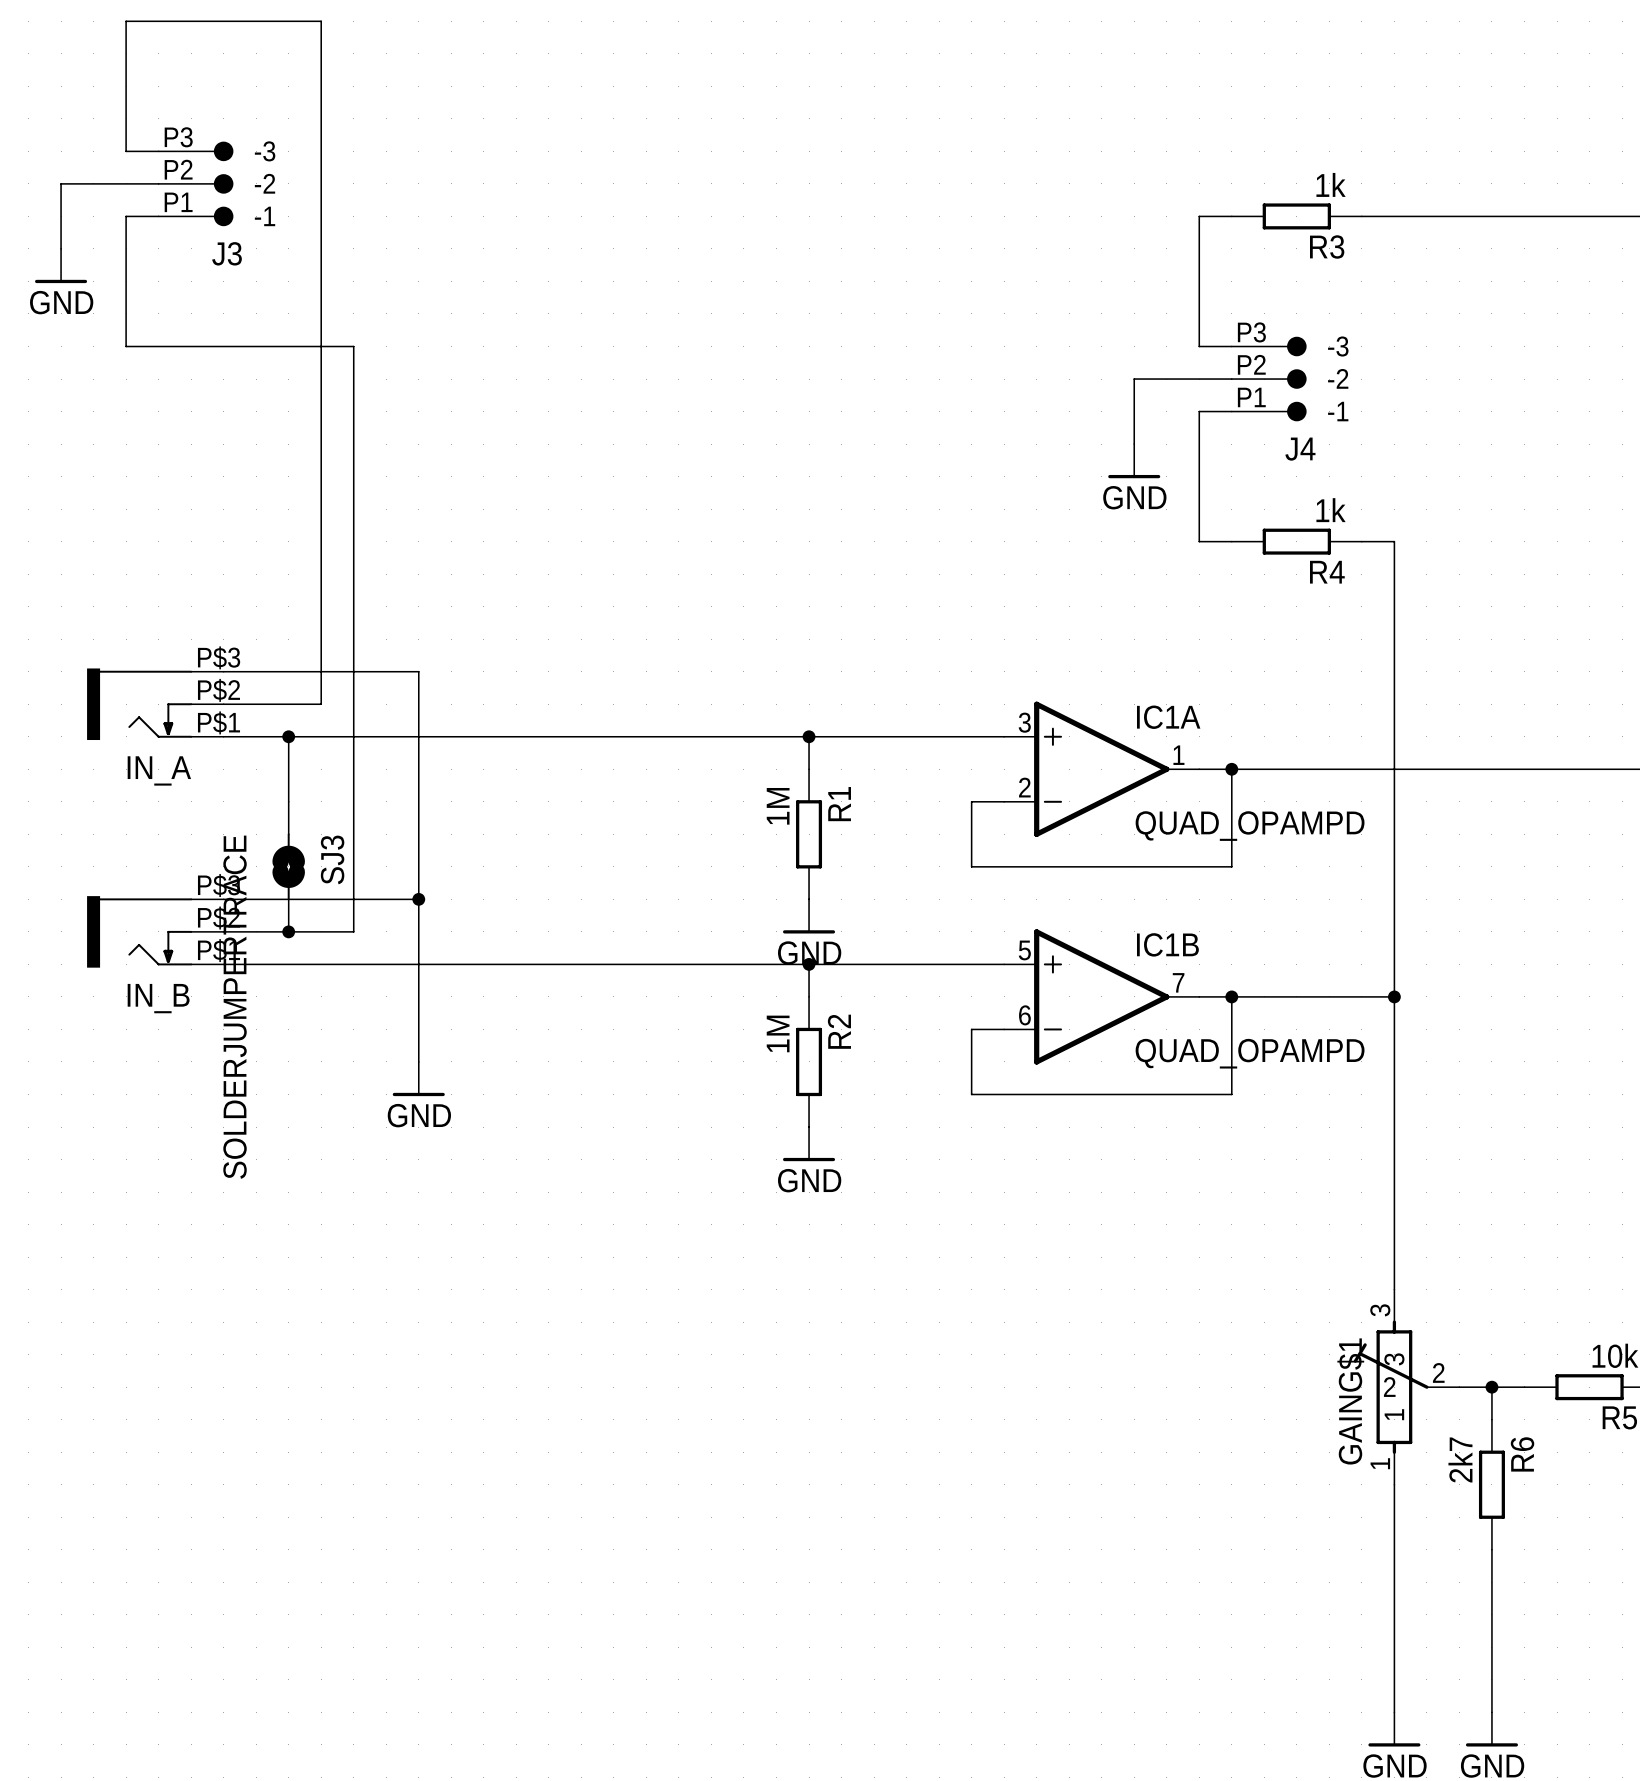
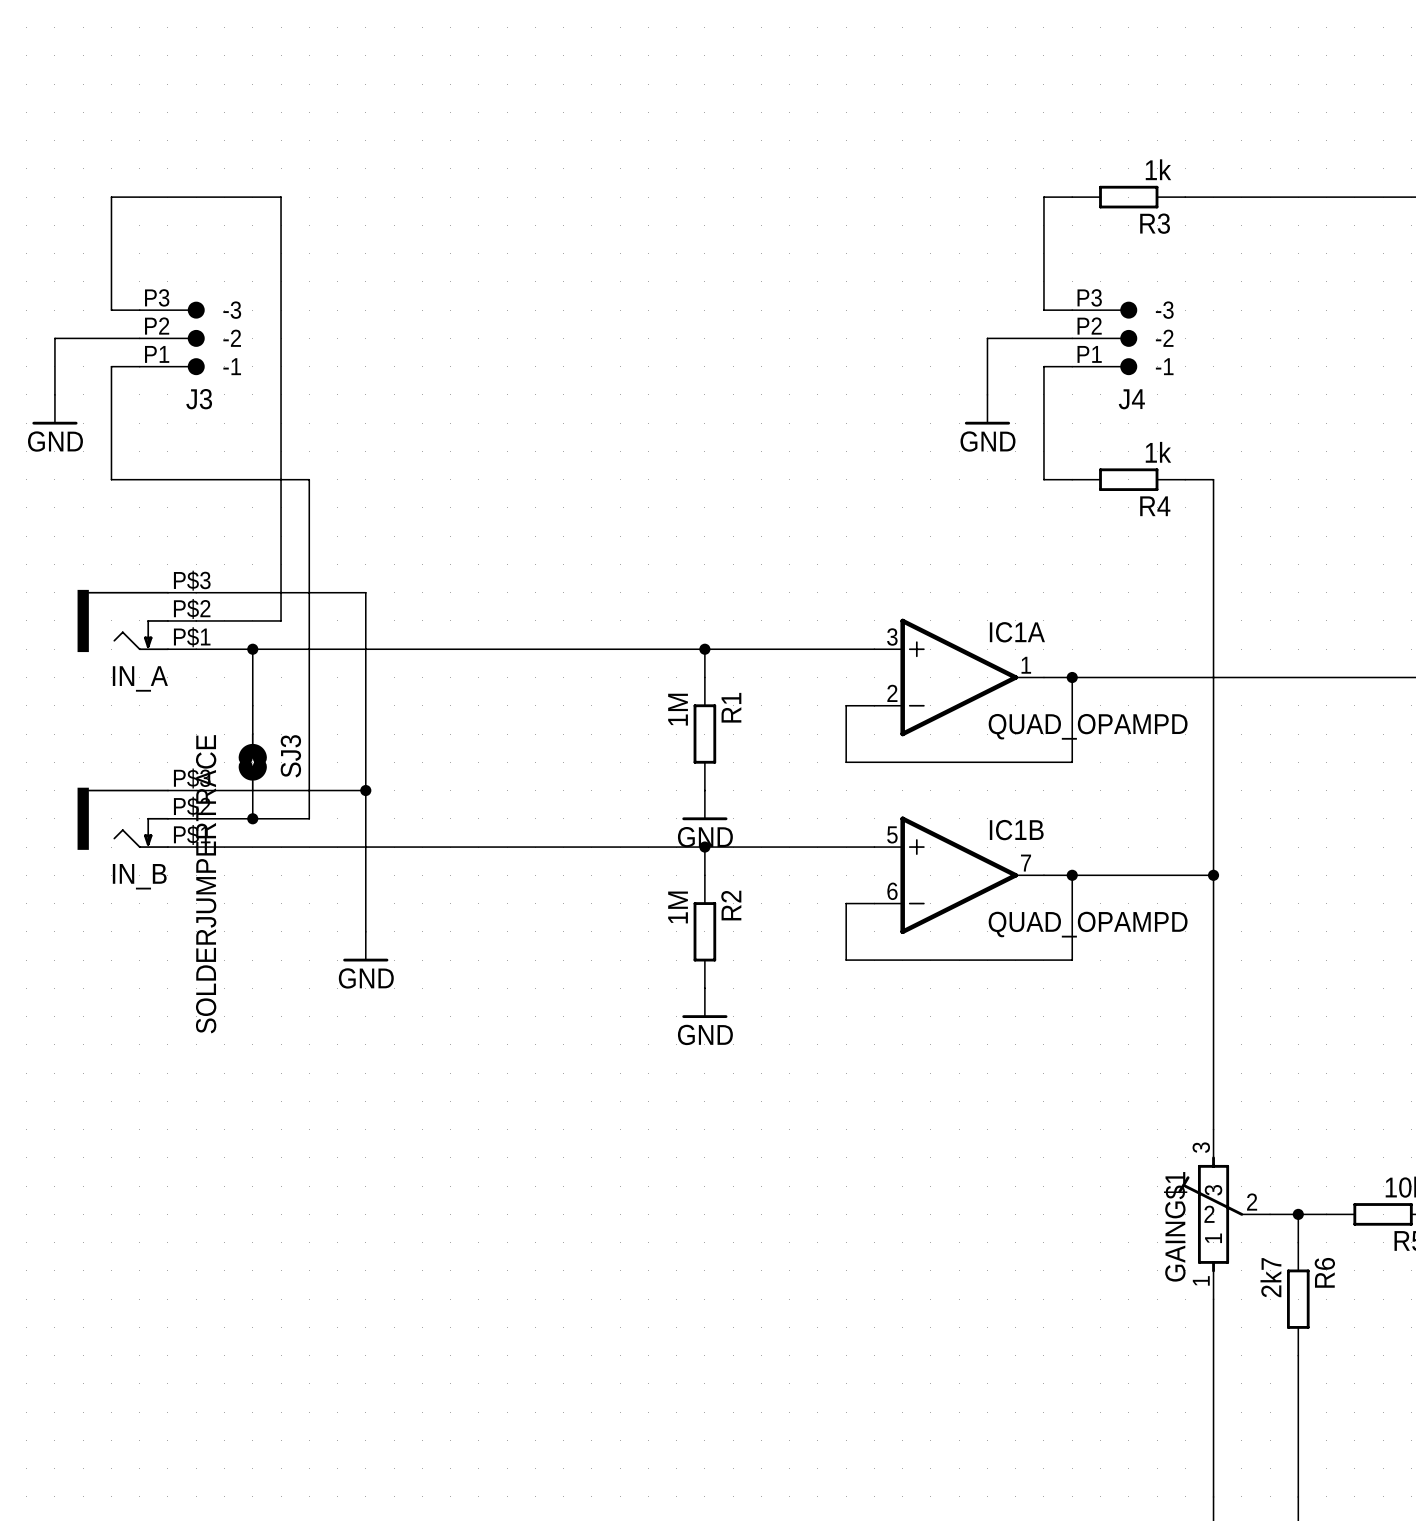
wire: (158, 151) (126, 151) (126, 21) (321, 21) (321, 216) -> (139, 197) (281, 197)
wire: (158, 183) (61, 183) (61, 248) -> (139, 338) (54, 338) (54, 394)
J3 position: (196, 183) -> (172, 338)
power symbol position: GND (61, 266) -> GND (54, 409)
wire: (158, 346) (353, 346) (353, 541) -> (139, 366) (111, 366) (111, 479) (309, 479)

